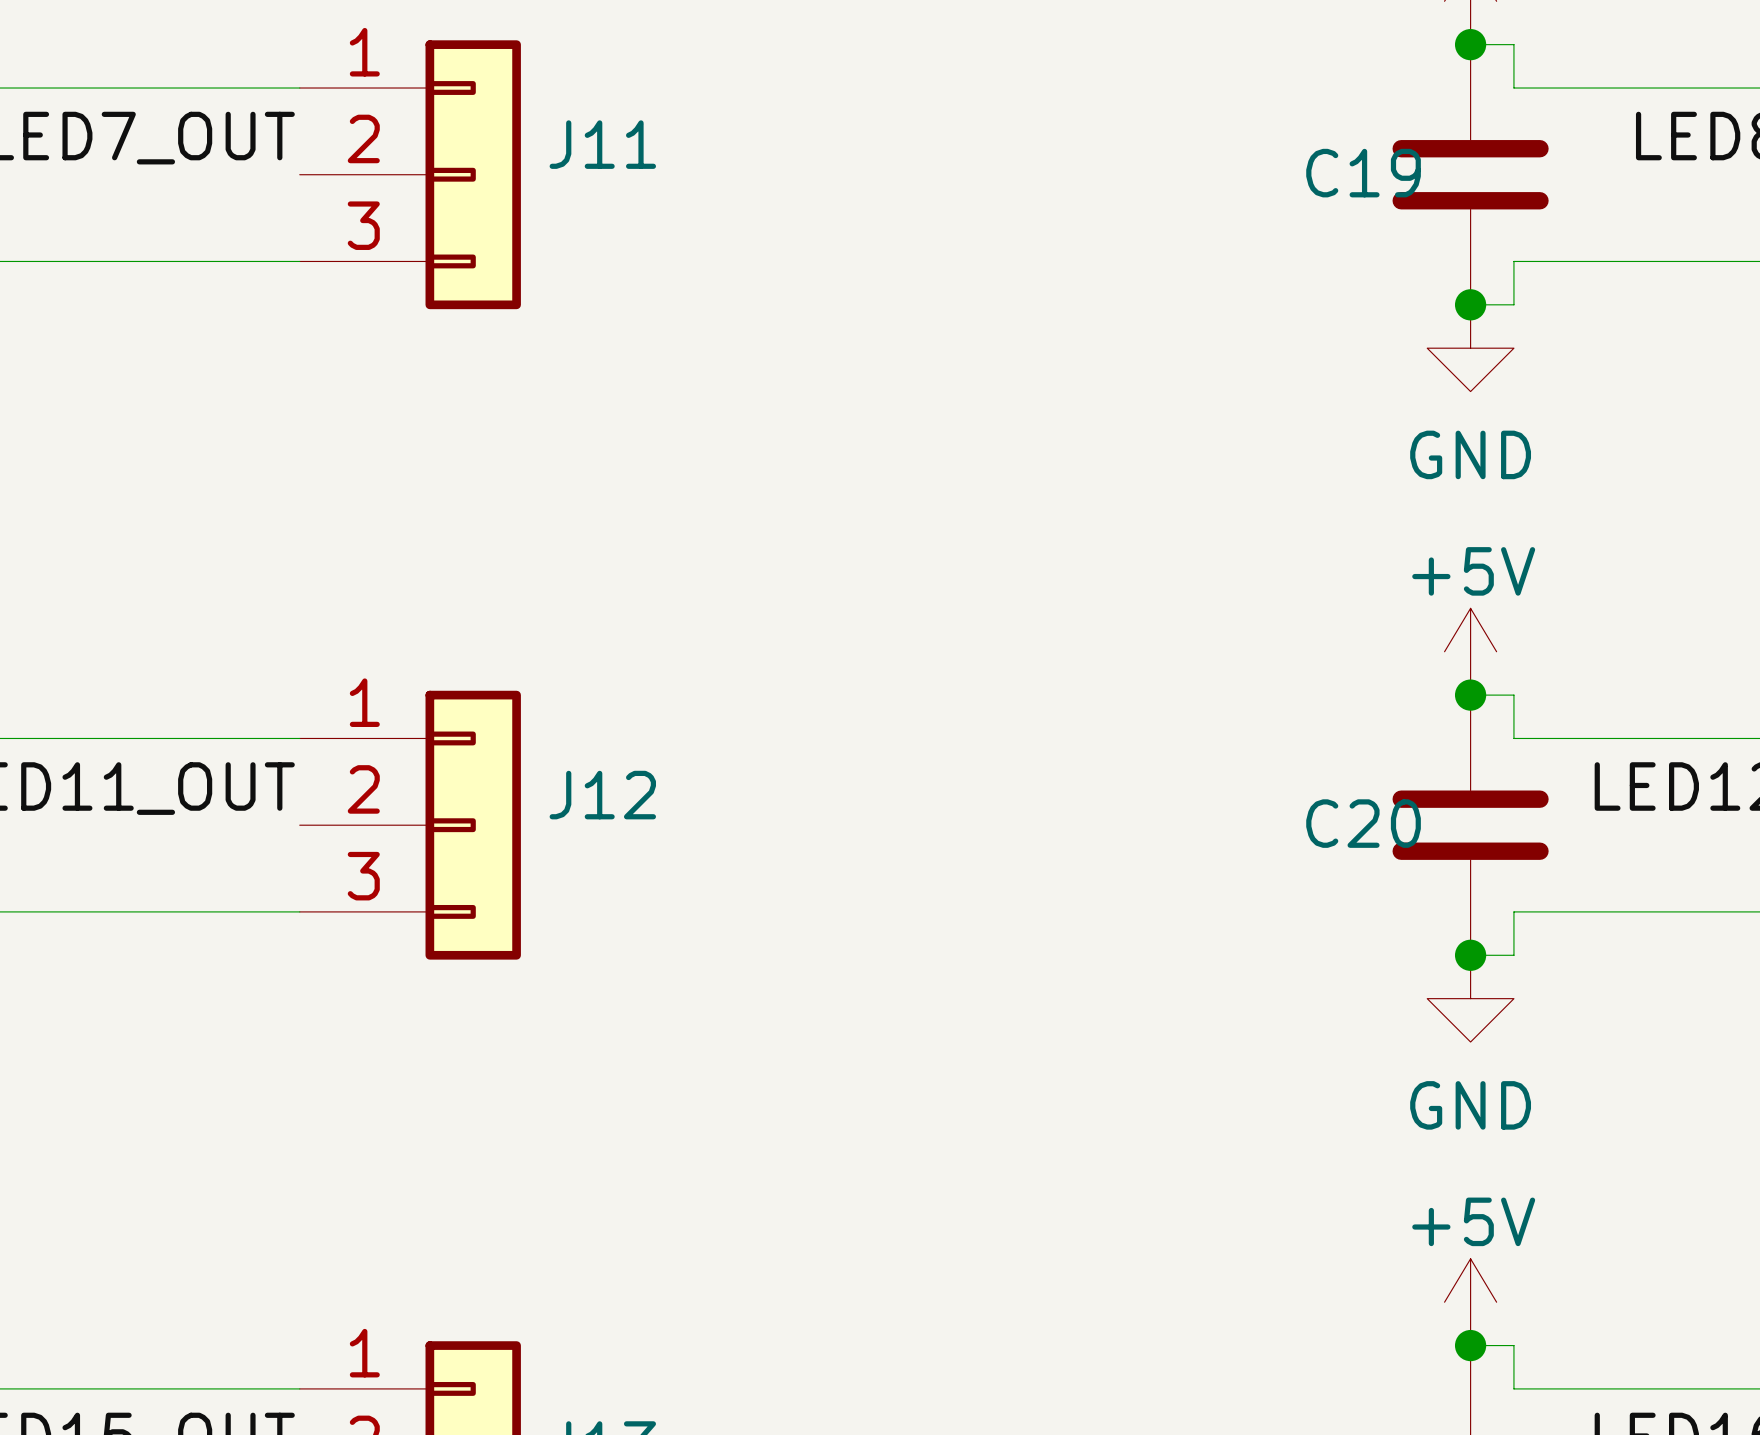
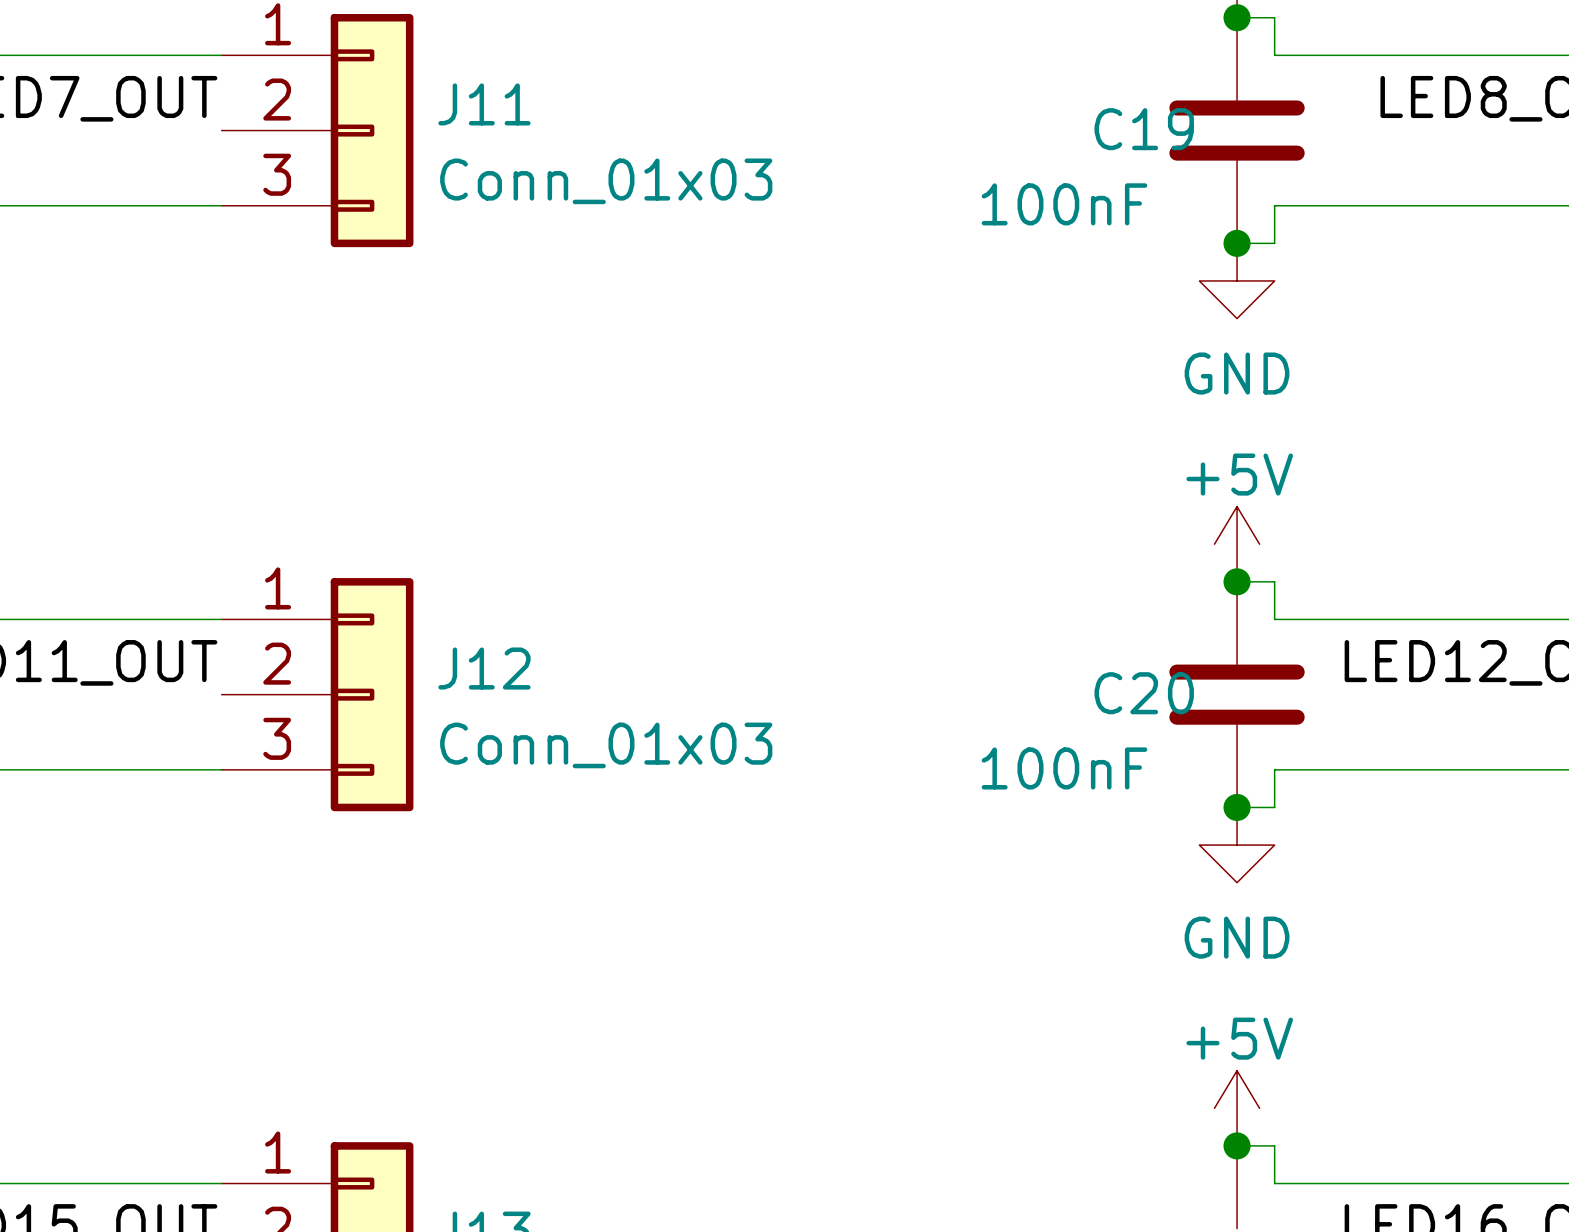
J11 value: none -> Conn_01x03 (606, 181)
C19 value: none -> 100nF (1064, 204)
J12 value: none -> Conn_01x03 (606, 745)
C20 value: none -> 100nF (1064, 768)

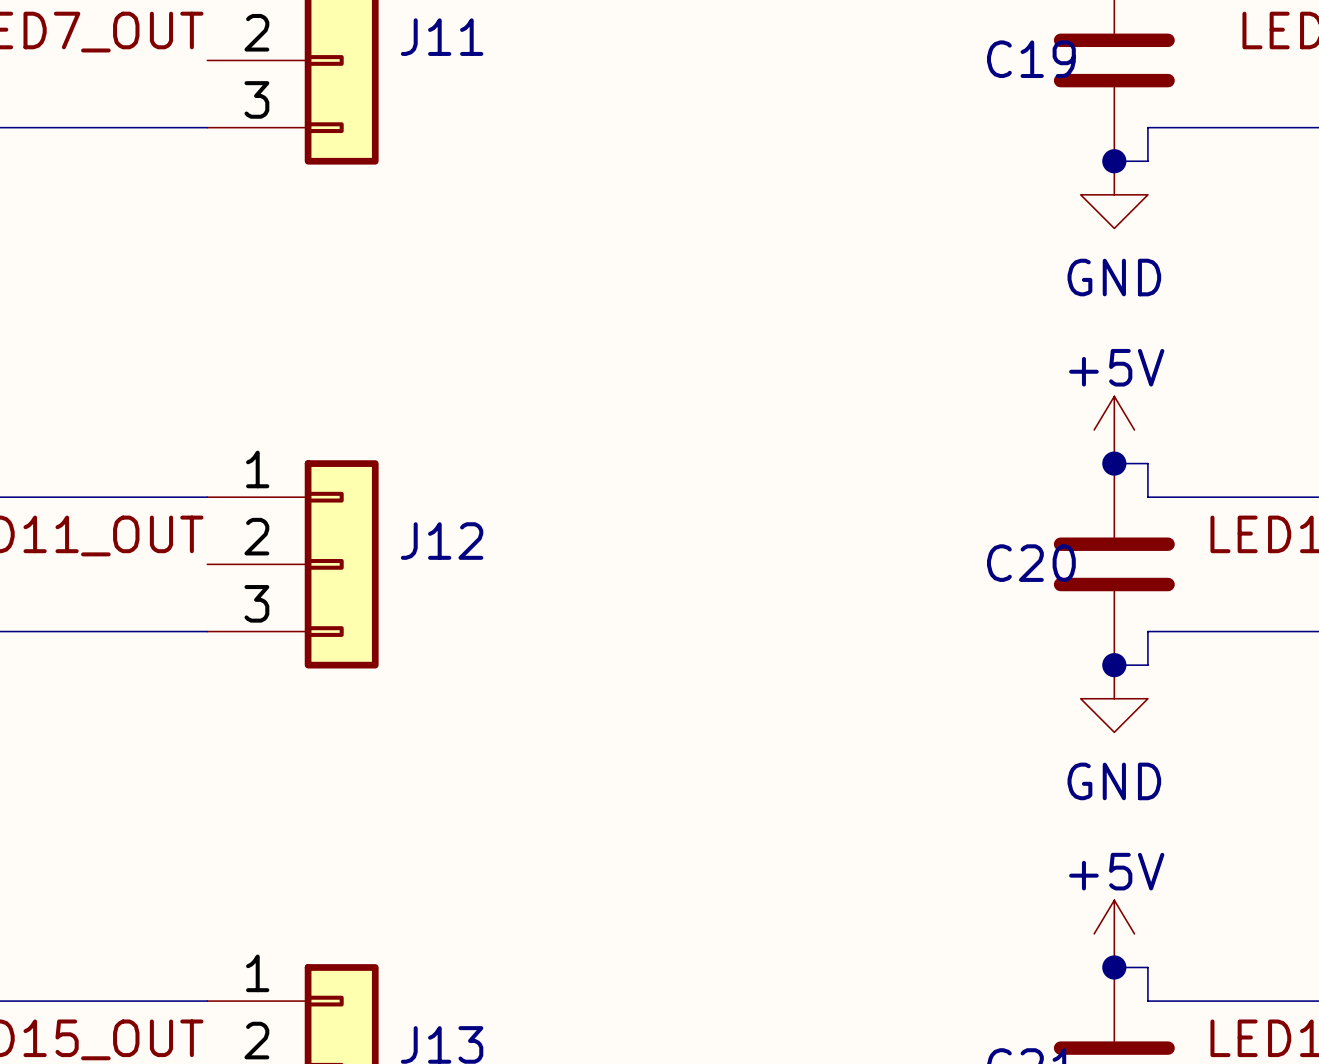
J11 value: Conn_01x03 (606, 181) -> none
C19 value: 100nF (1064, 204) -> none
J12 value: Conn_01x03 (606, 745) -> none
C20 value: 100nF (1064, 768) -> none

